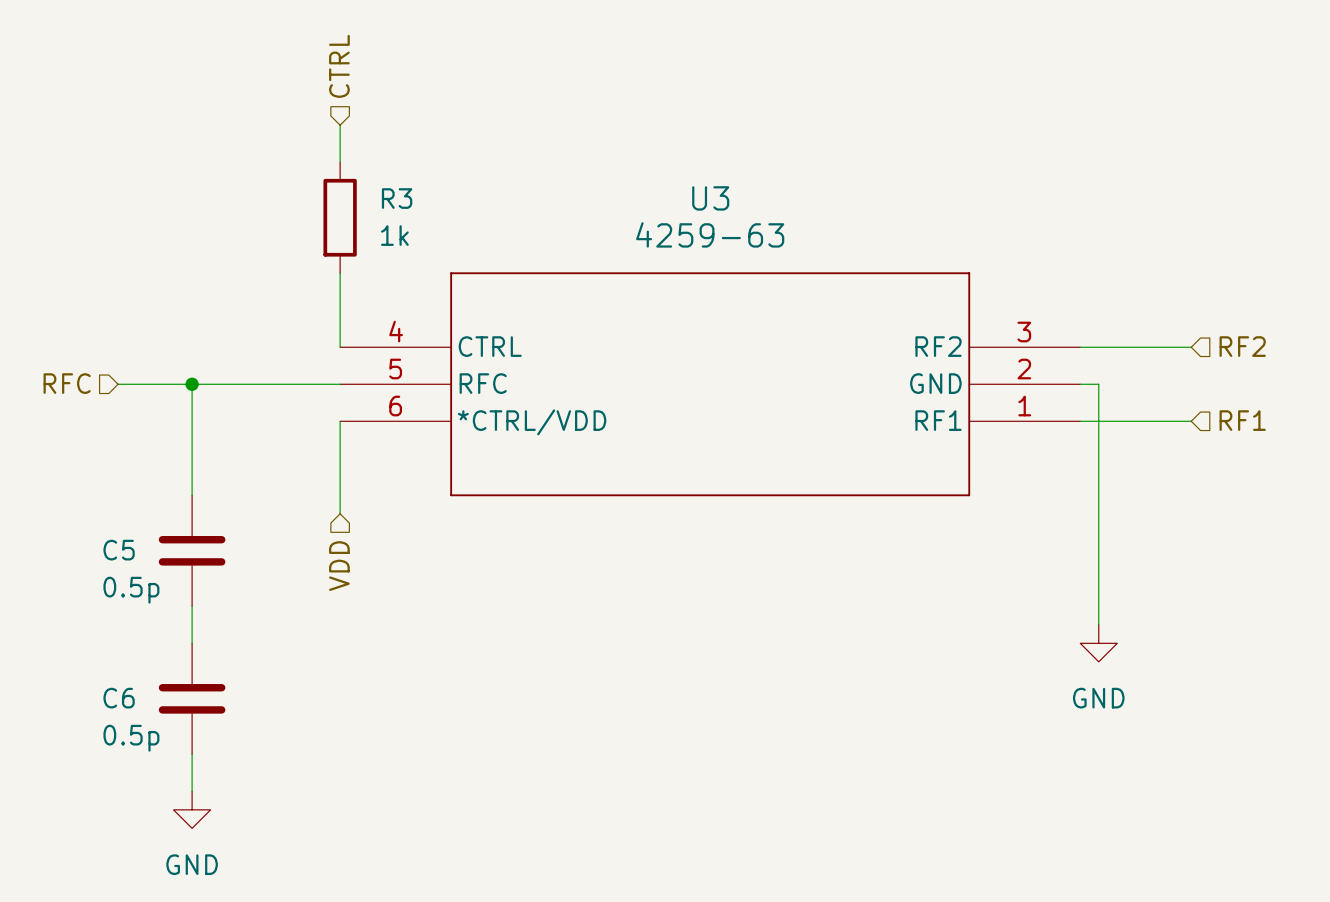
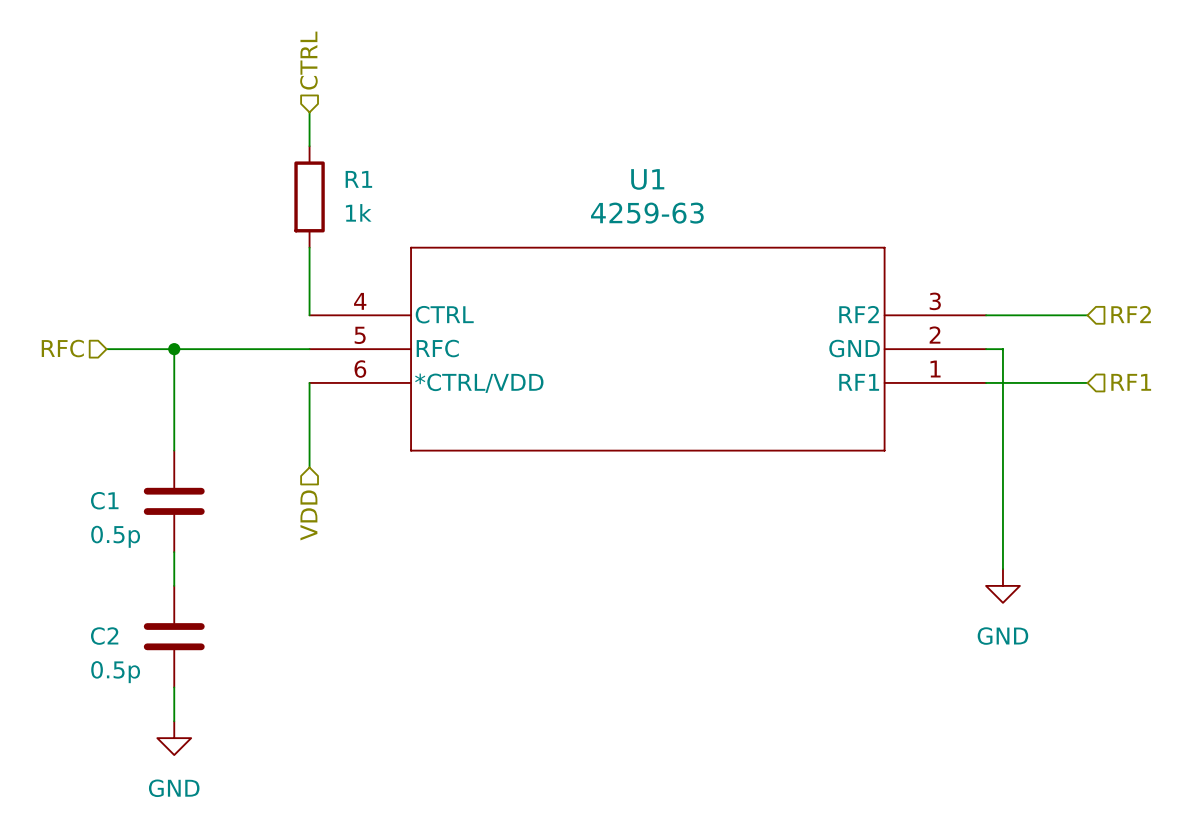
R3 name: R3 (397, 198) -> R1 (358, 179)
U3 name: U3 (710, 198) -> U1 (647, 179)
C5 name: C5 (119, 550) -> C1 (104, 500)
C6 name: C6 (119, 698) -> C2 (104, 636)

